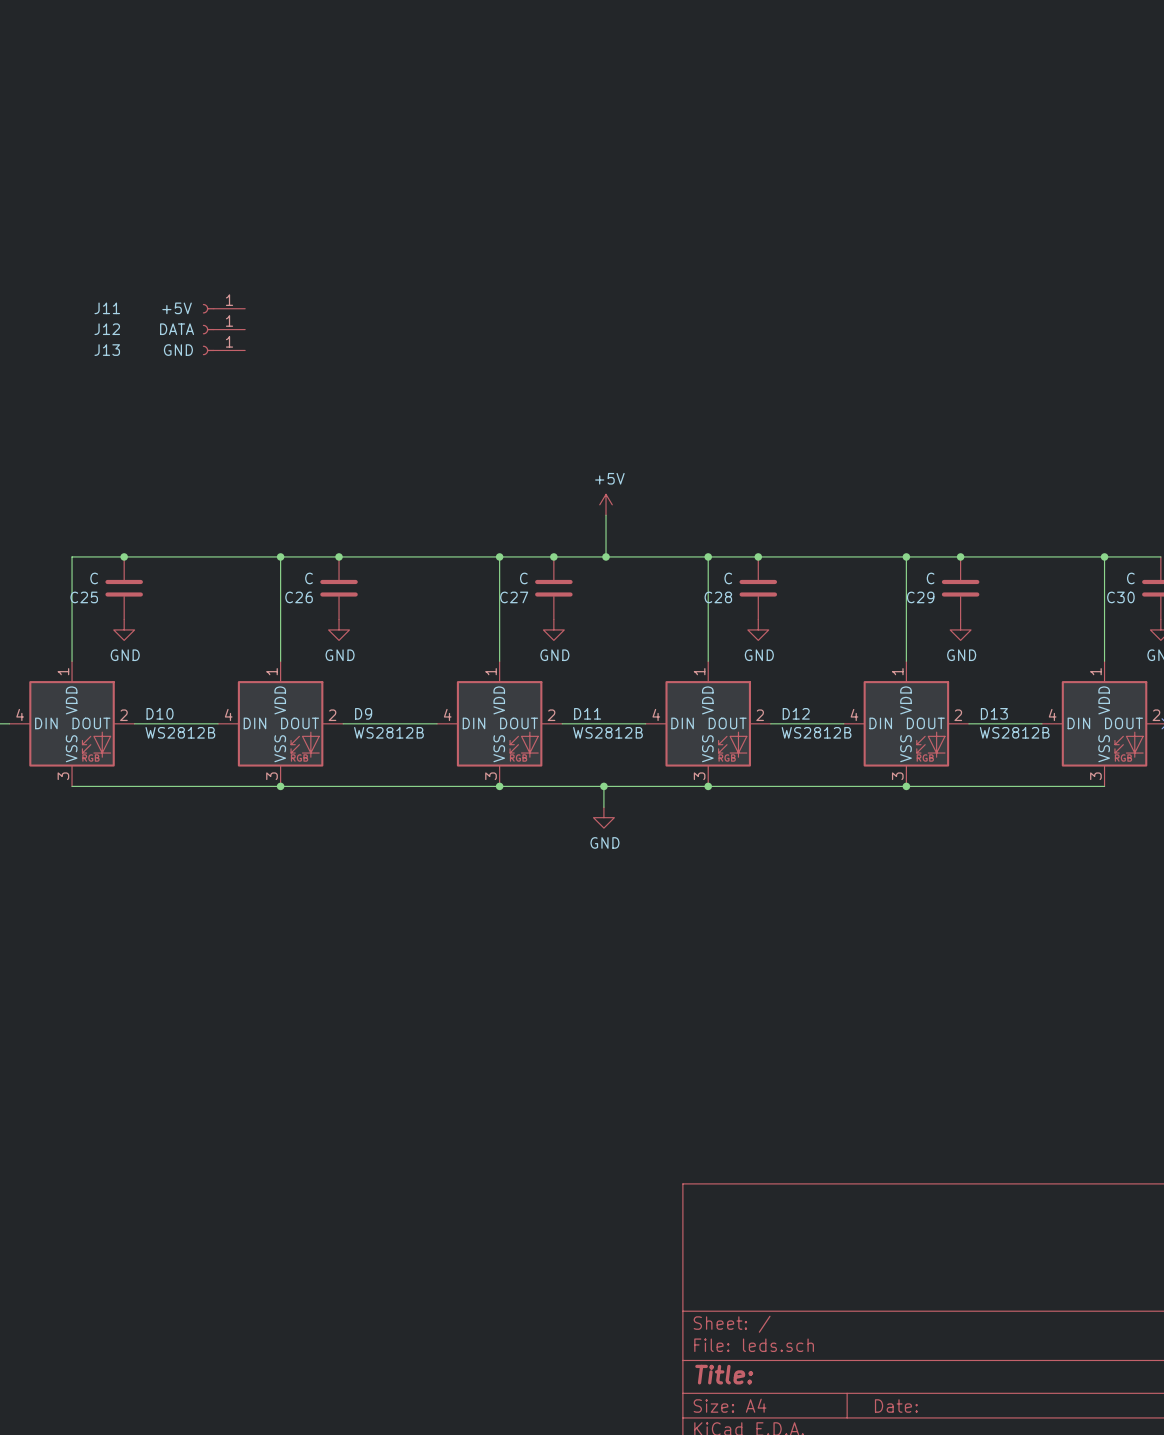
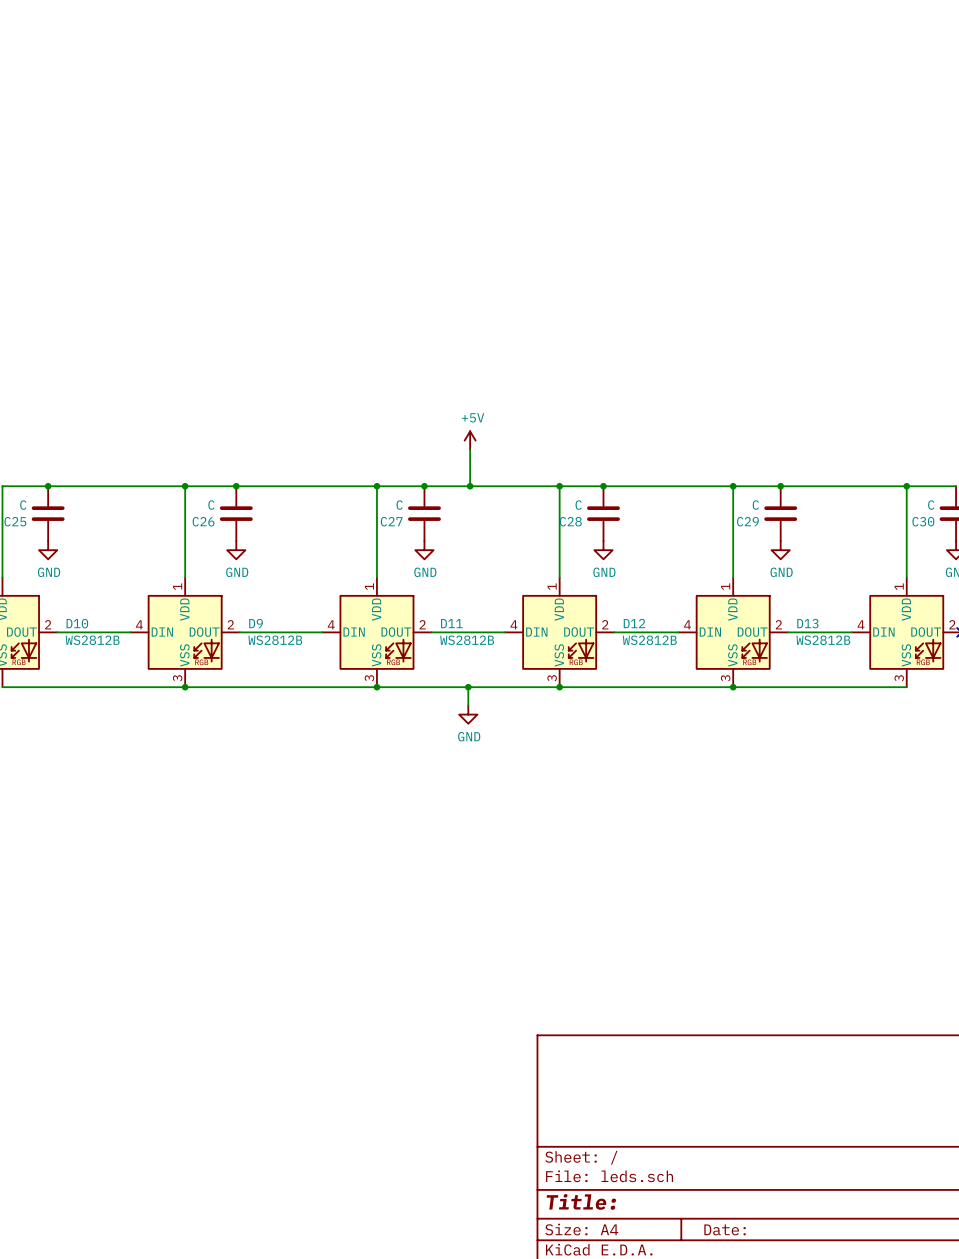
J11: +5V (223, 308) -> none
J12: DATA (223, 329) -> none
J13: GND (223, 350) -> none

